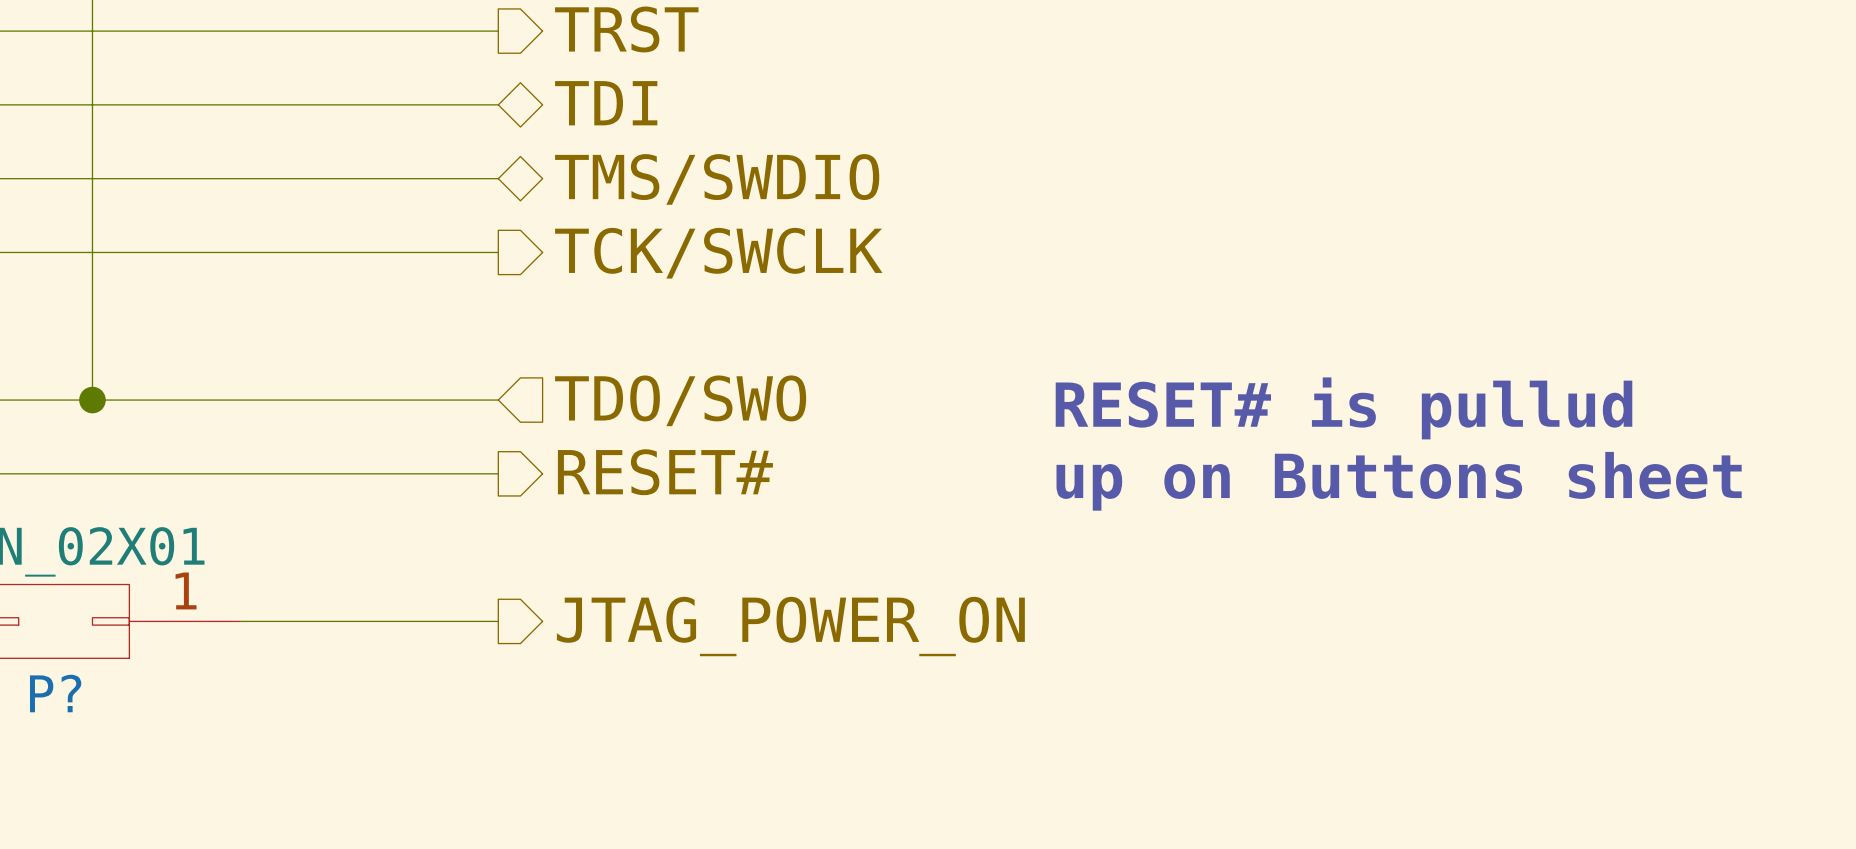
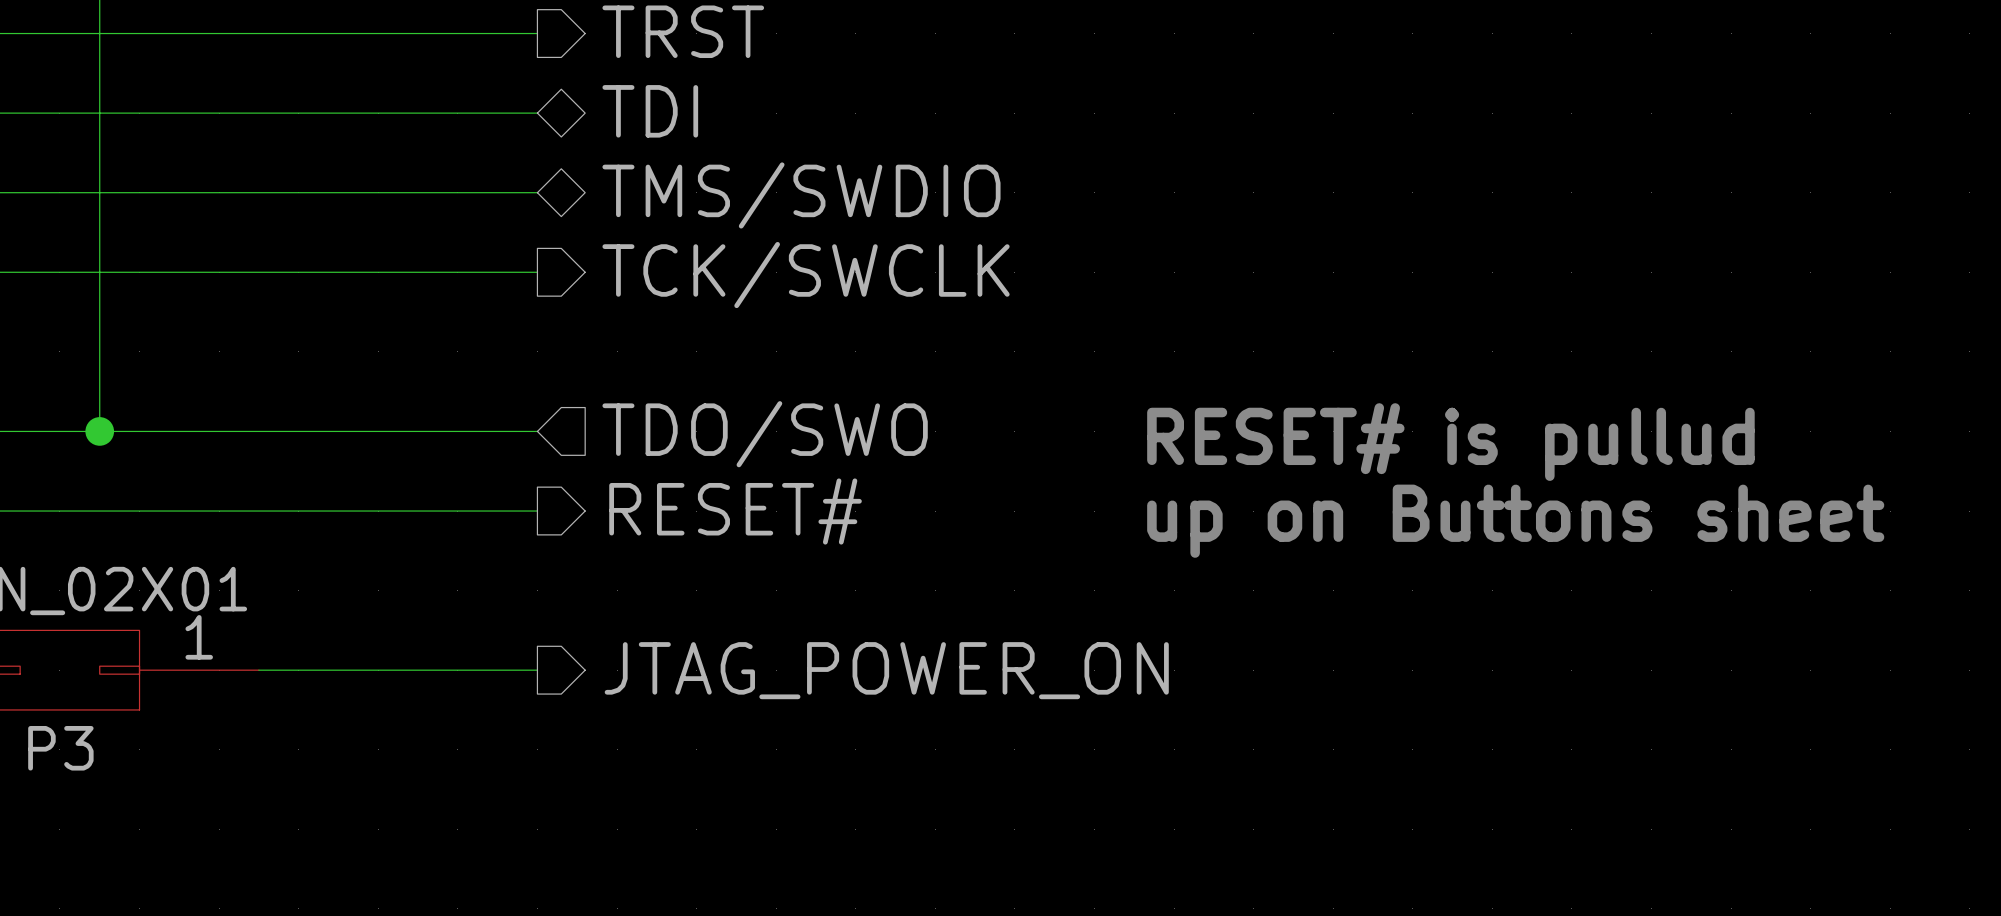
P? name: P? (55, 693) -> P3 (60, 748)

